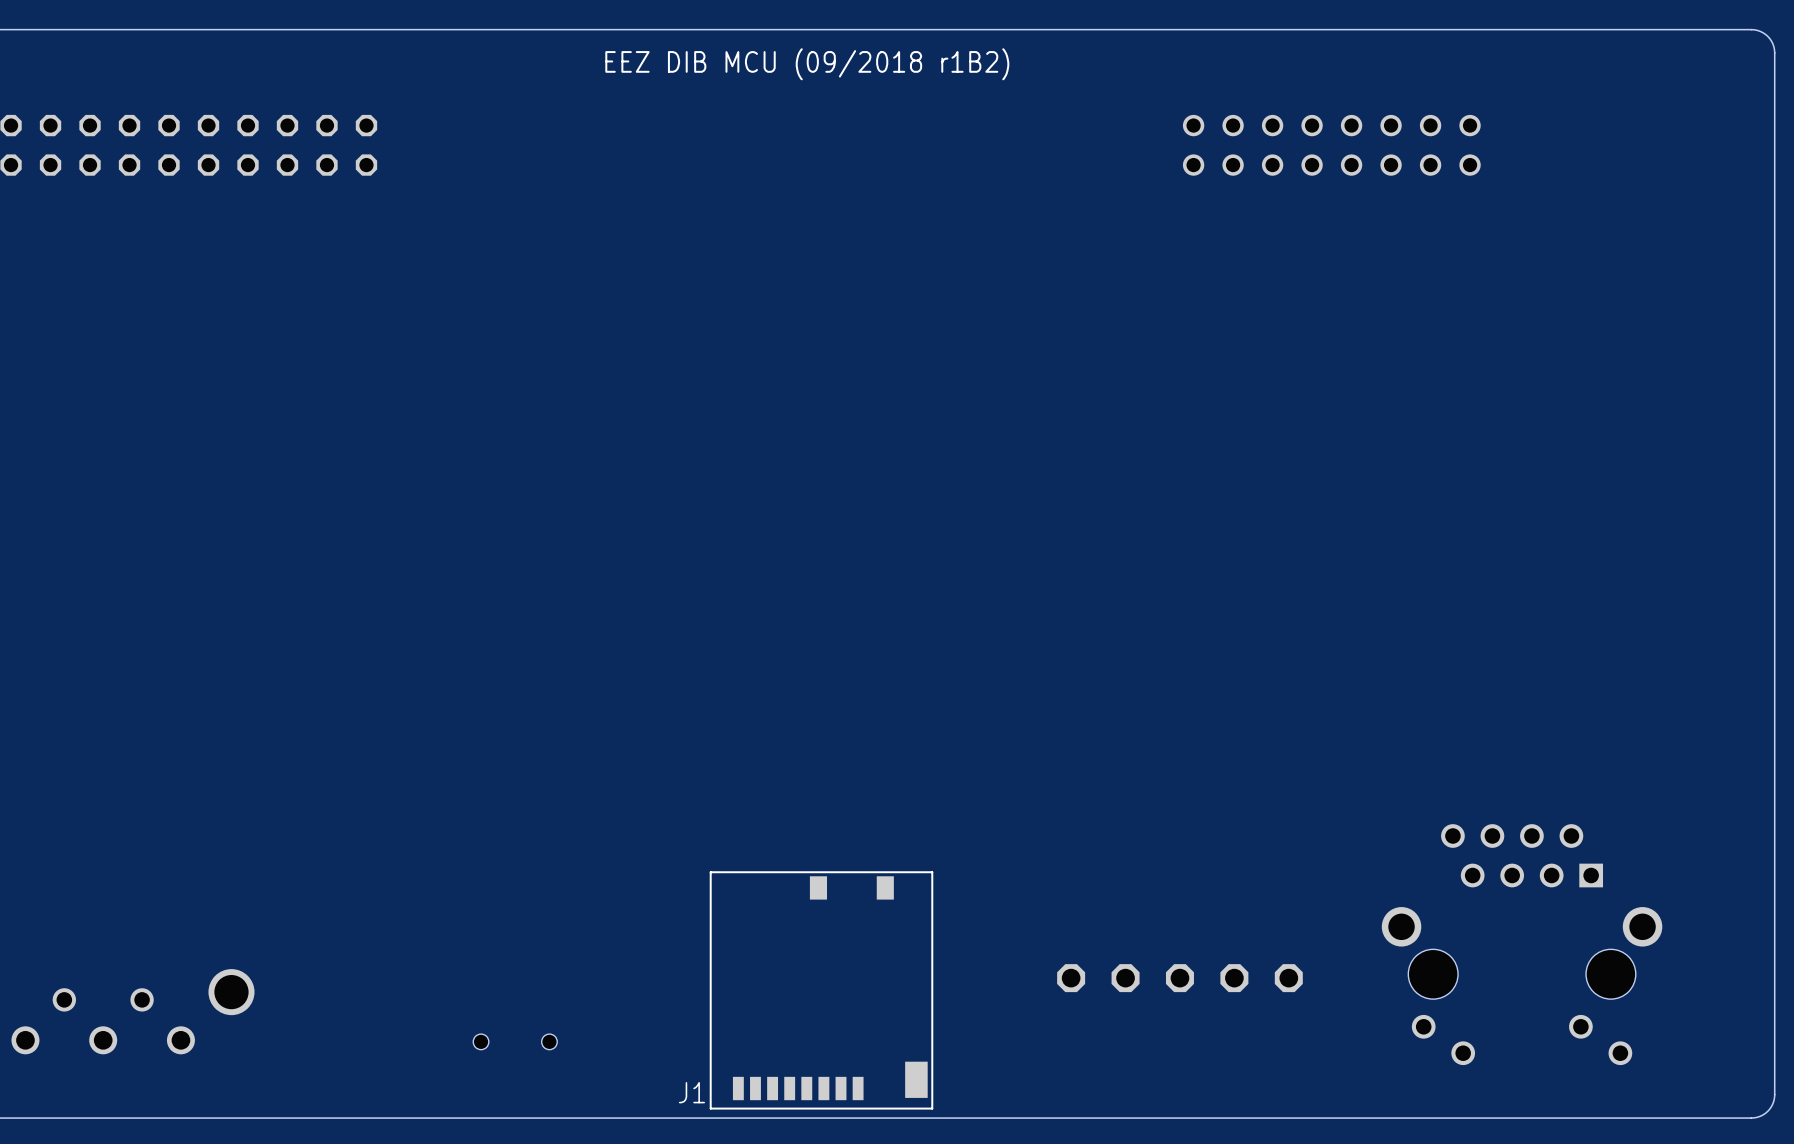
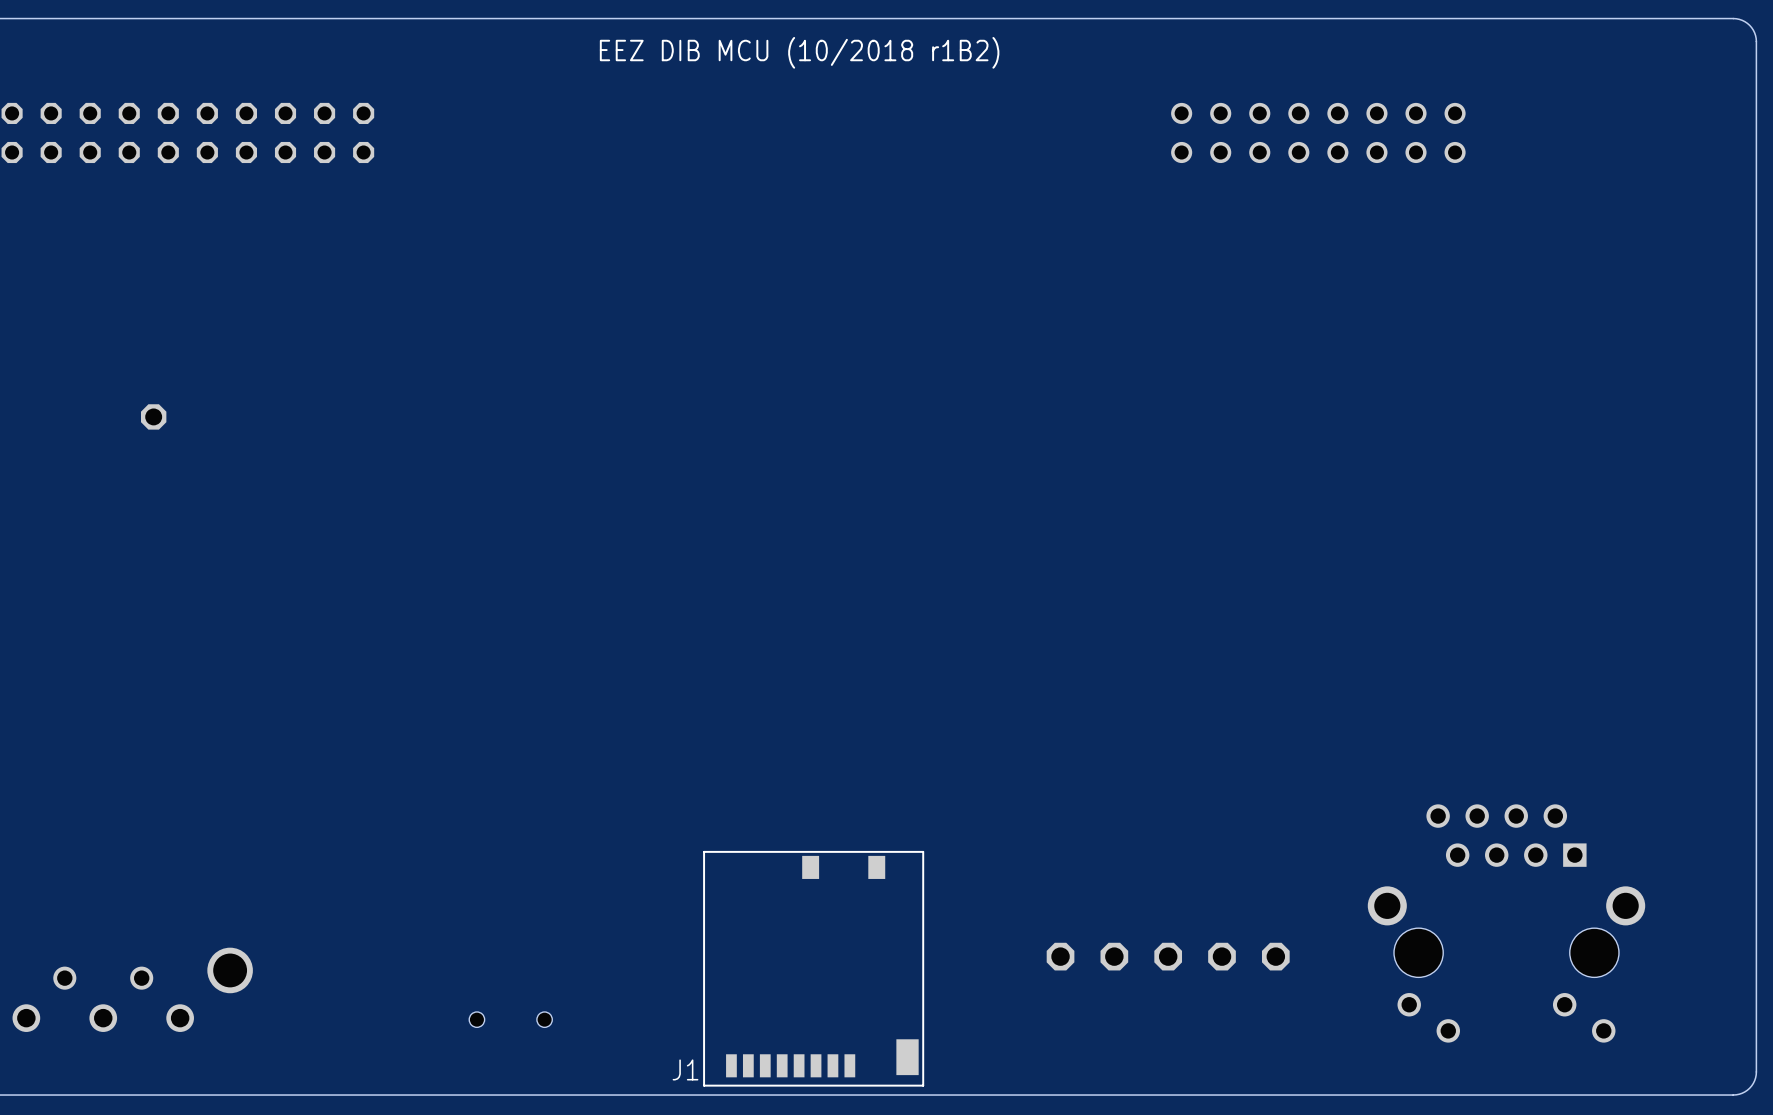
text: EEZ DIB MCU (09/2018 r1B2) (807, 64) -> EEZ DIB MCU (10/2018 r1B2) (799, 52)
part: none -> (153, 416)

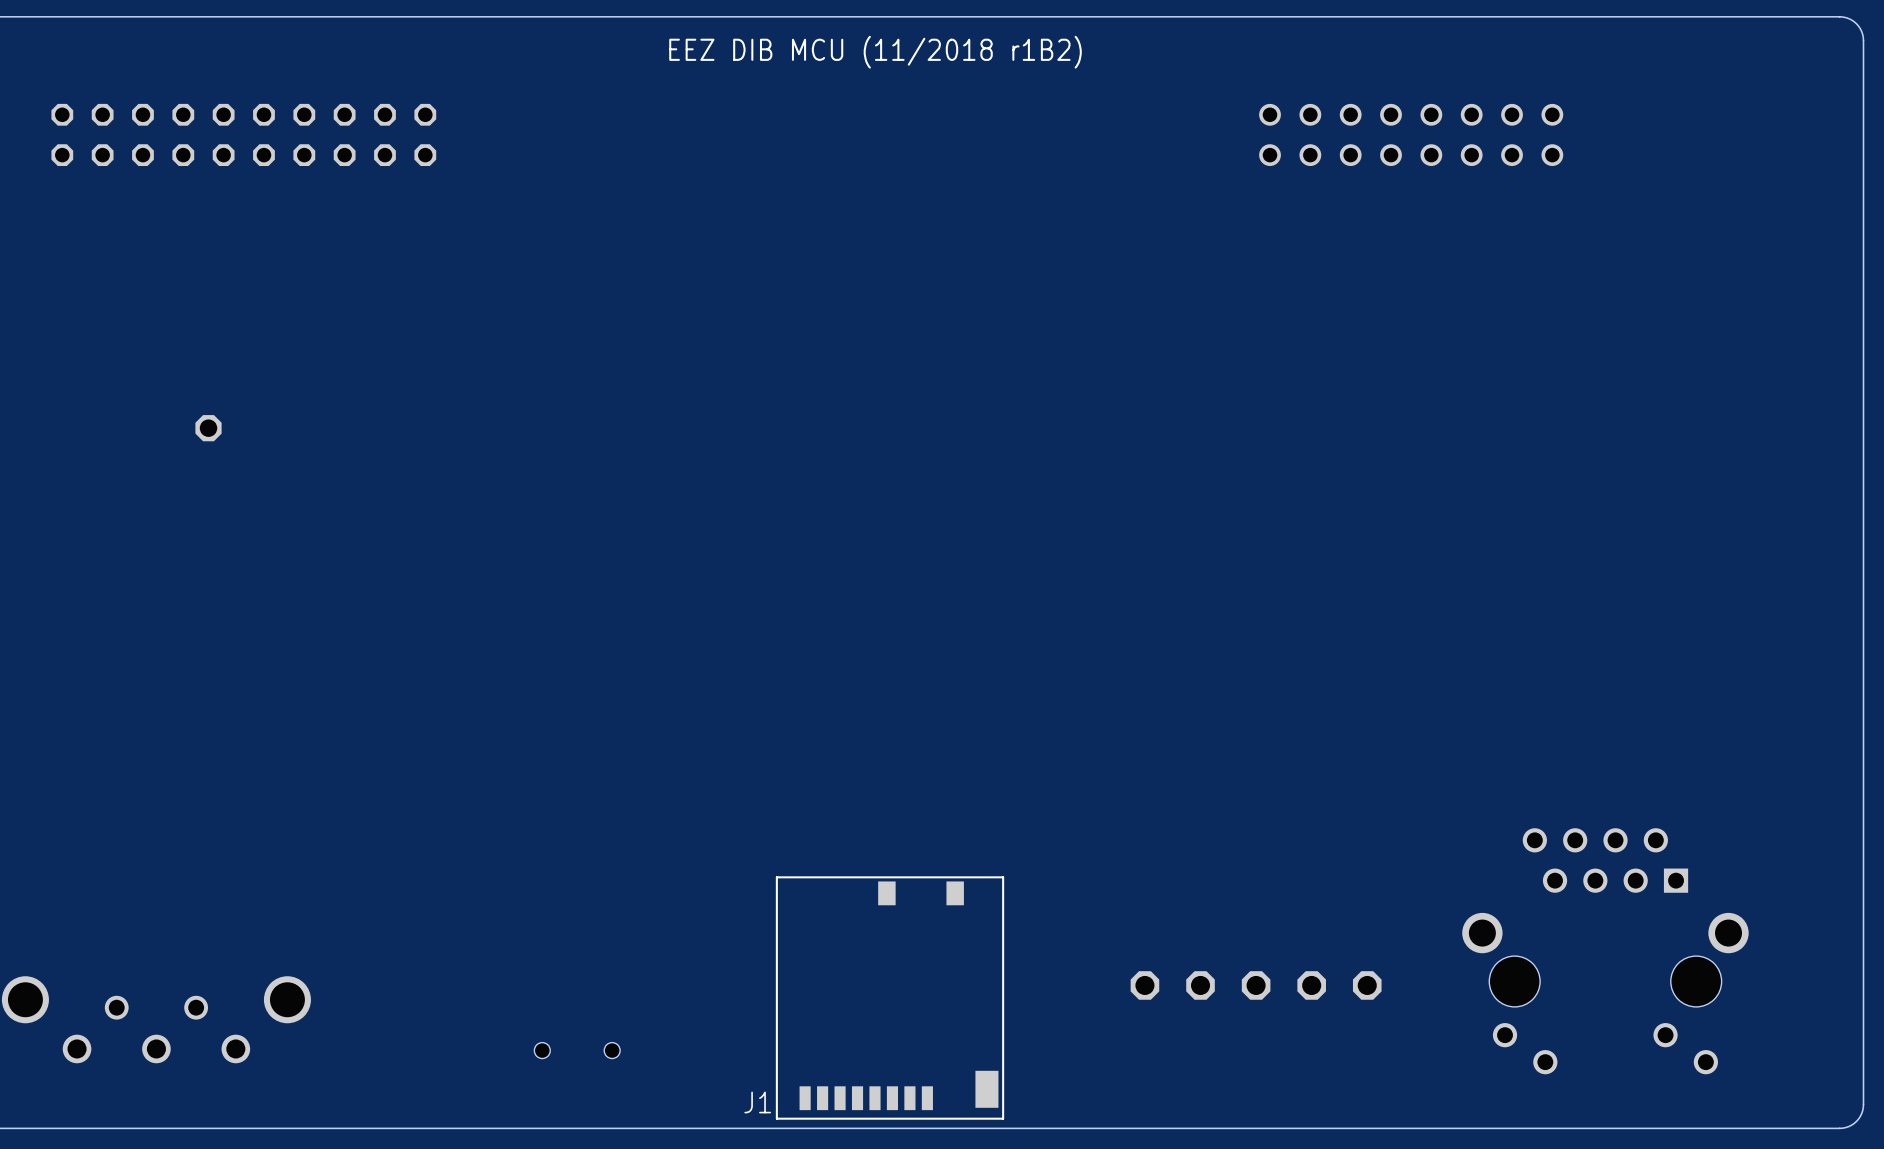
text: EEZ DIB MCU (10/2018 r1B2) (799, 52) -> EEZ DIB MCU (11/2018 r1B2) (875, 52)

